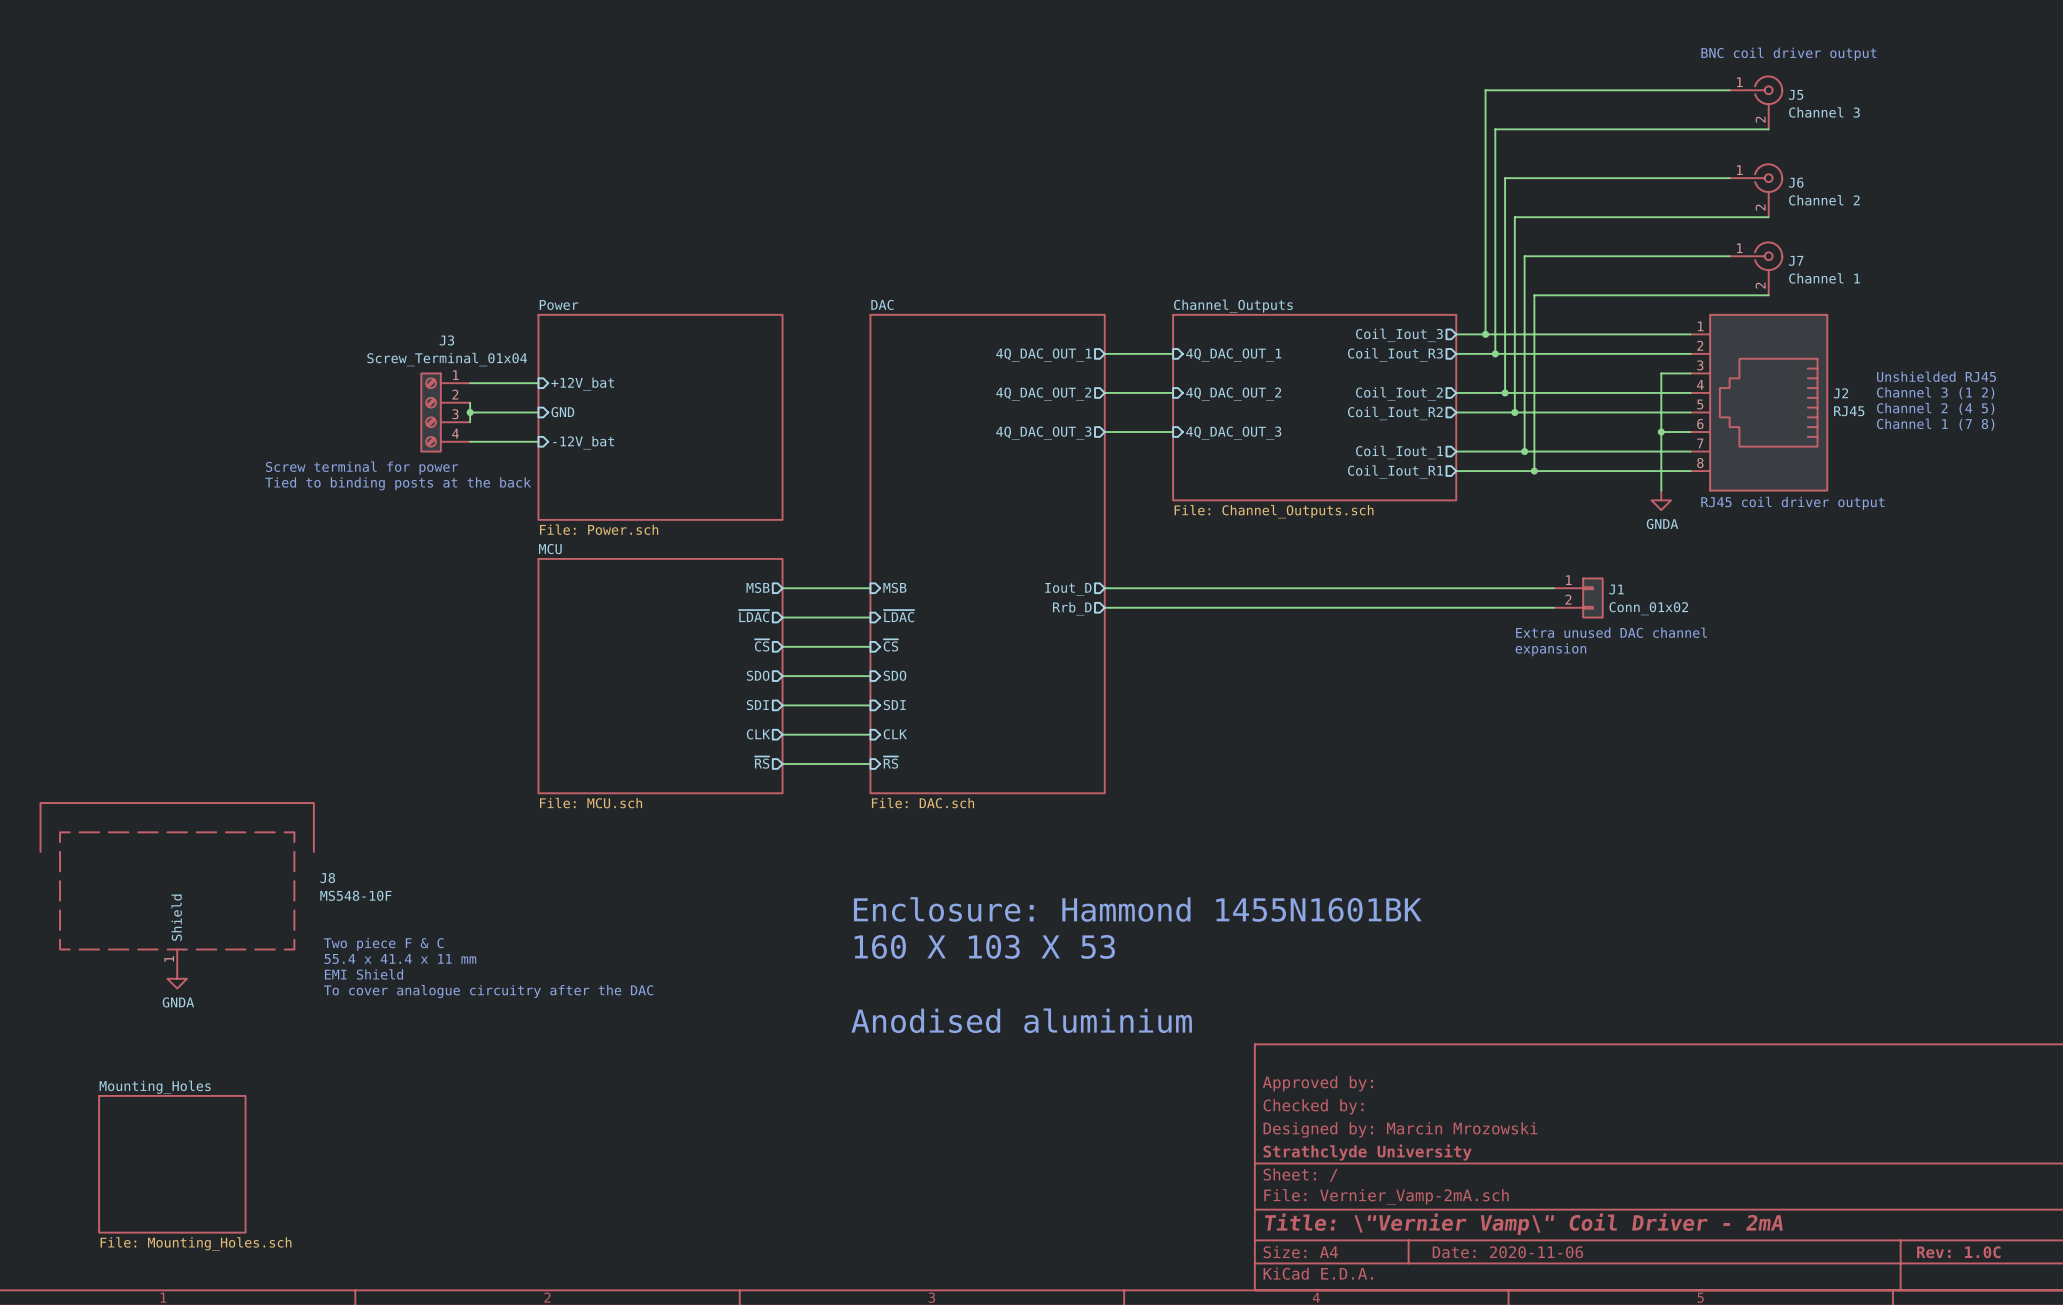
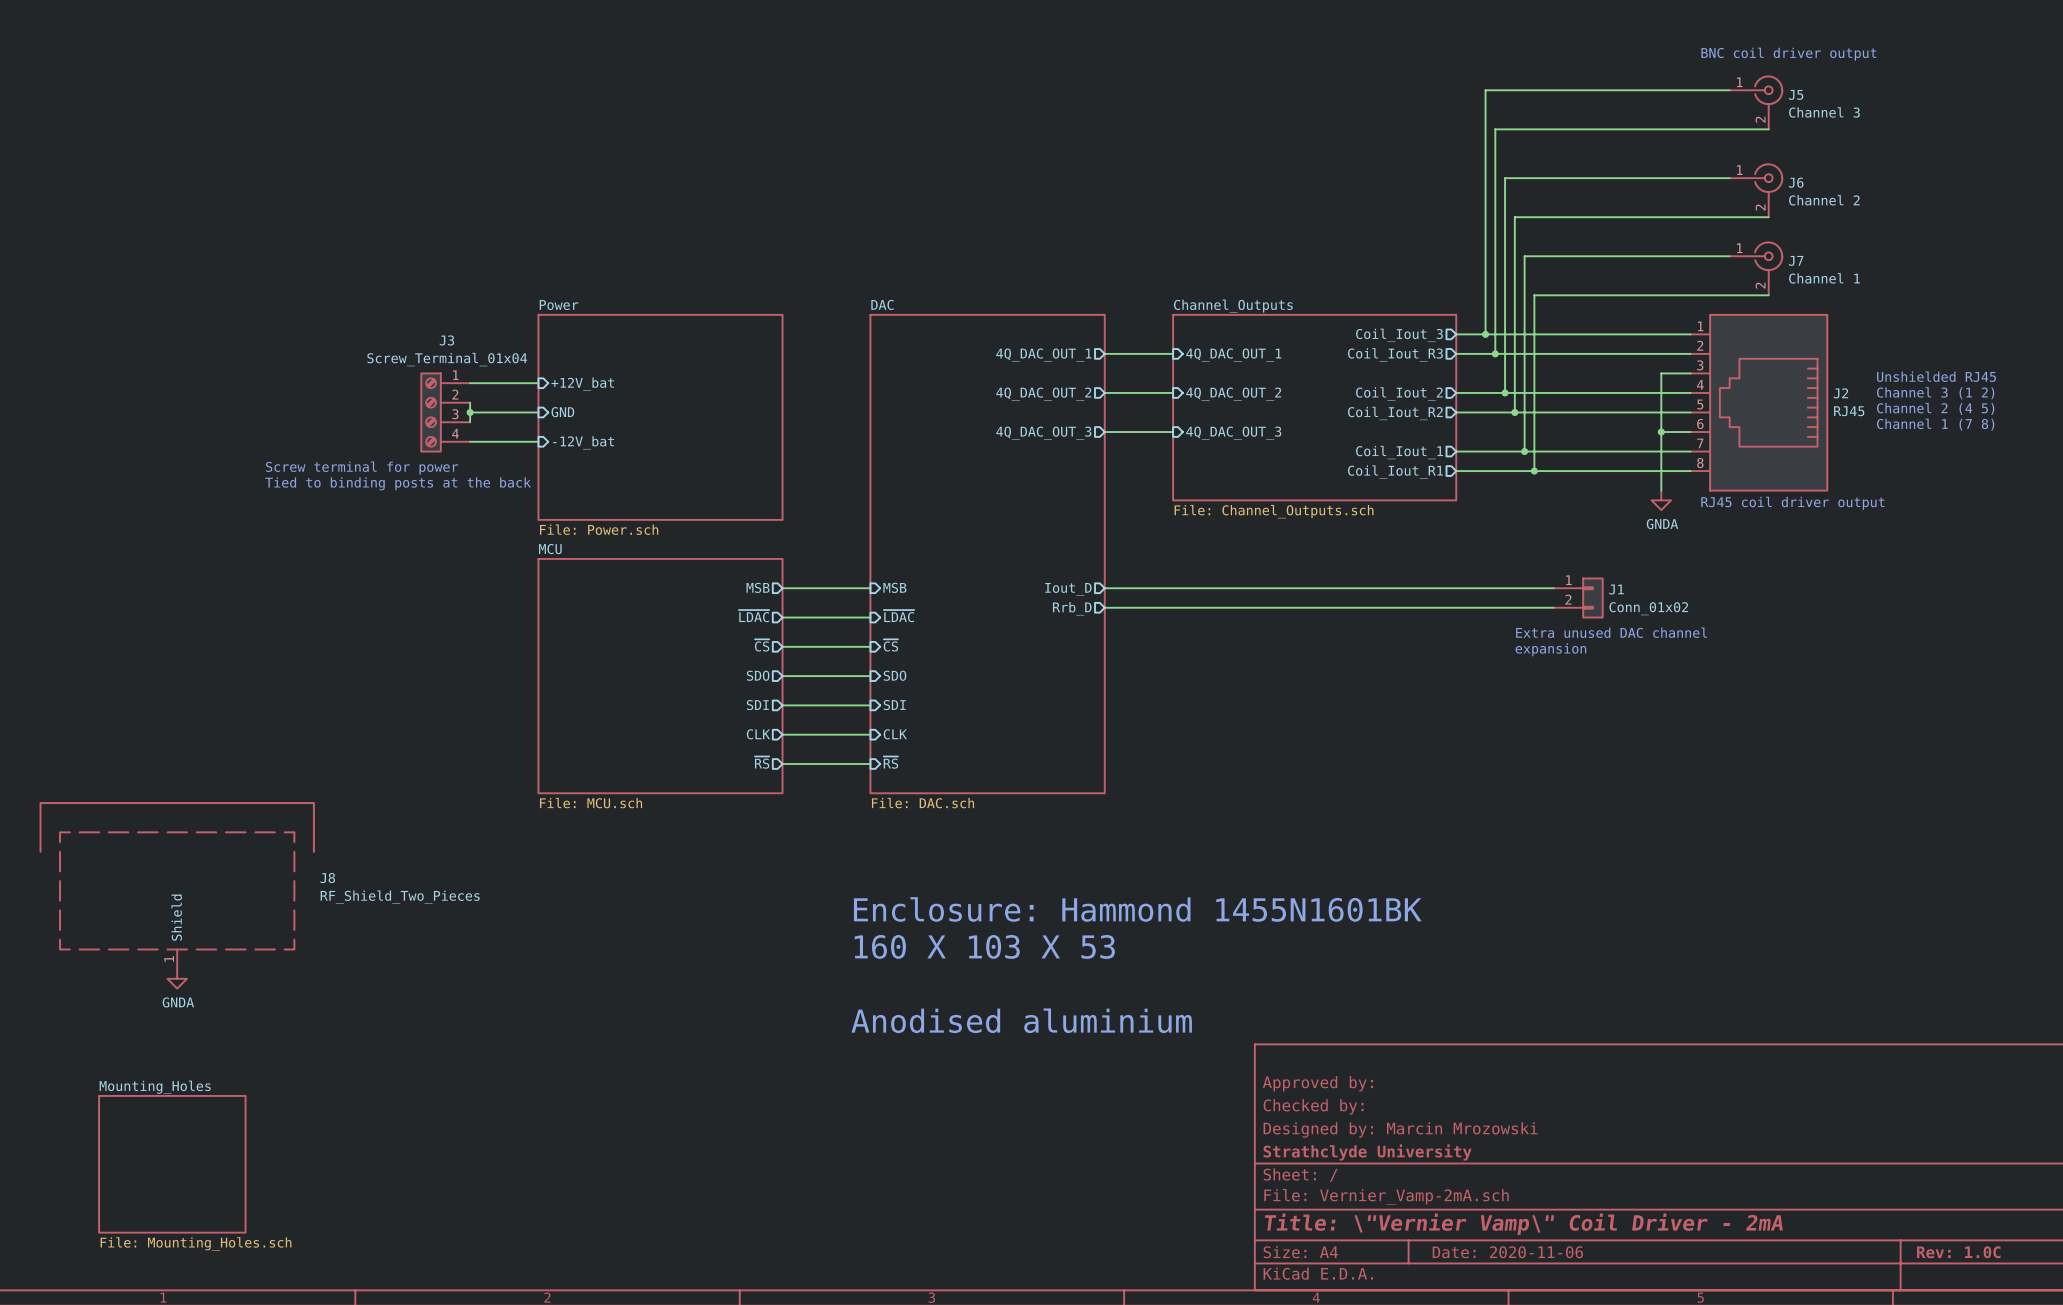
J8 value: MS548-10F (355, 895) -> RF_Shield_Two_Pieces (400, 897)
text: Two piece F & C (383, 944) -> none
text: 55.4 x 41.4 x 11 mm (400, 958) -> none
text: EMI Shield (363, 974) -> none
text: To cover analogue circuitry after the DAC (488, 991) -> none

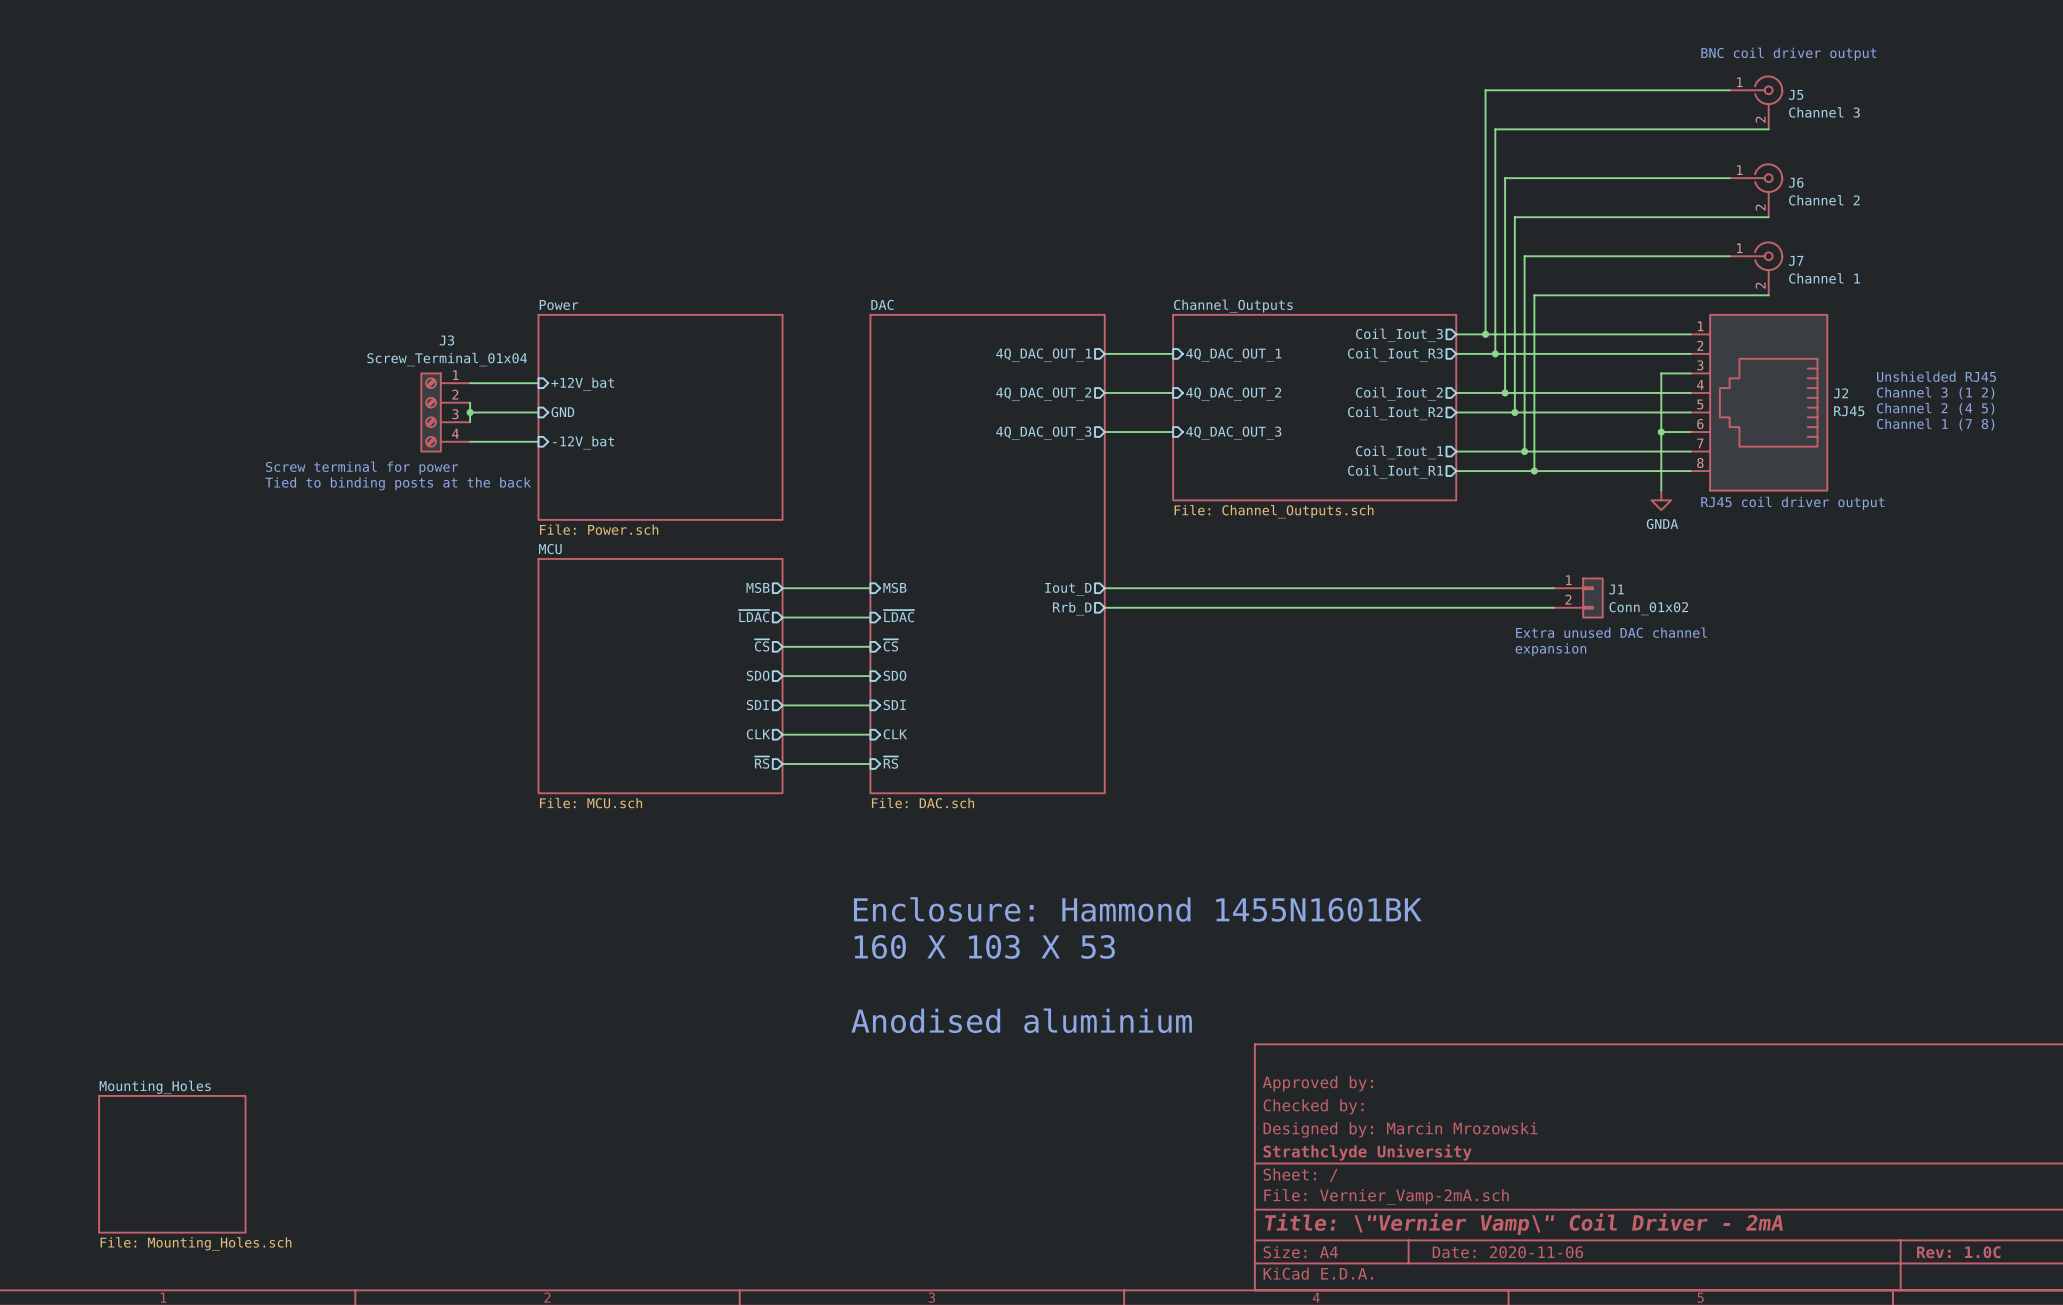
J8: RF_Shield_Two_Pieces (177, 885) -> none
power symbol: GNDA (177, 978) -> none

